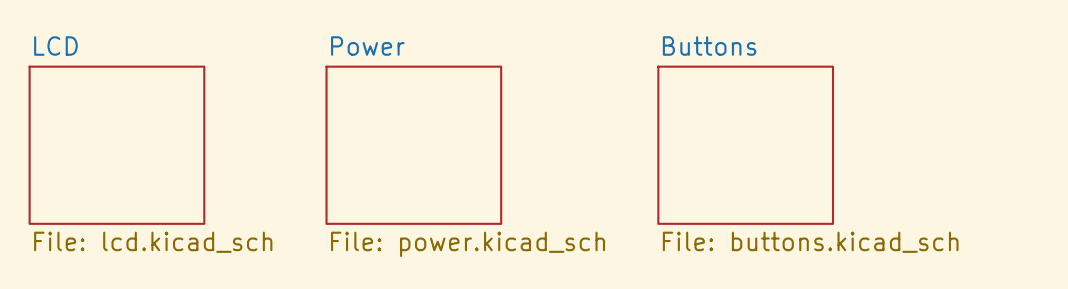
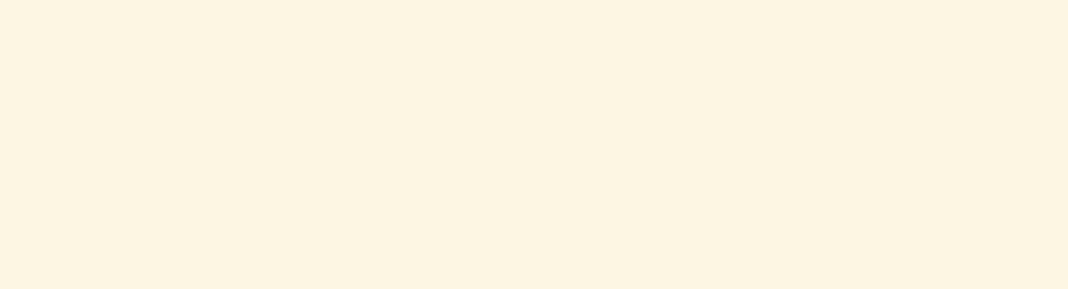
sheet LCD: File: lcd.kicad_sch (116, 145) -> none
sheet Power: File: power.kicad_sch (413, 145) -> none
sheet Buttons: File: buttons.kicad_sch (745, 145) -> none

